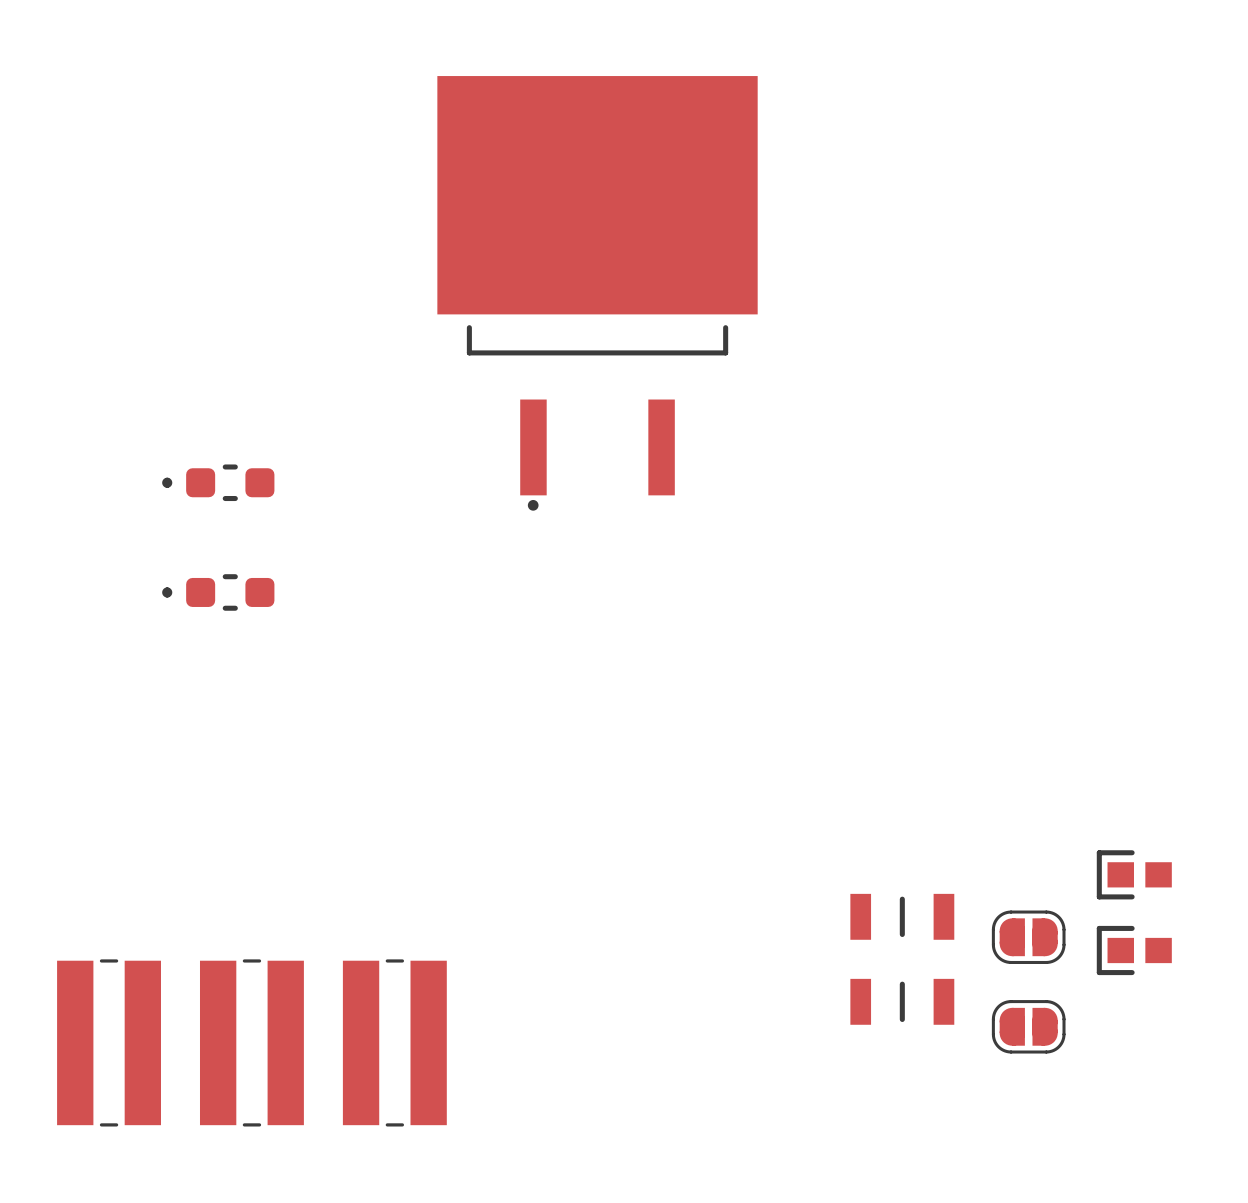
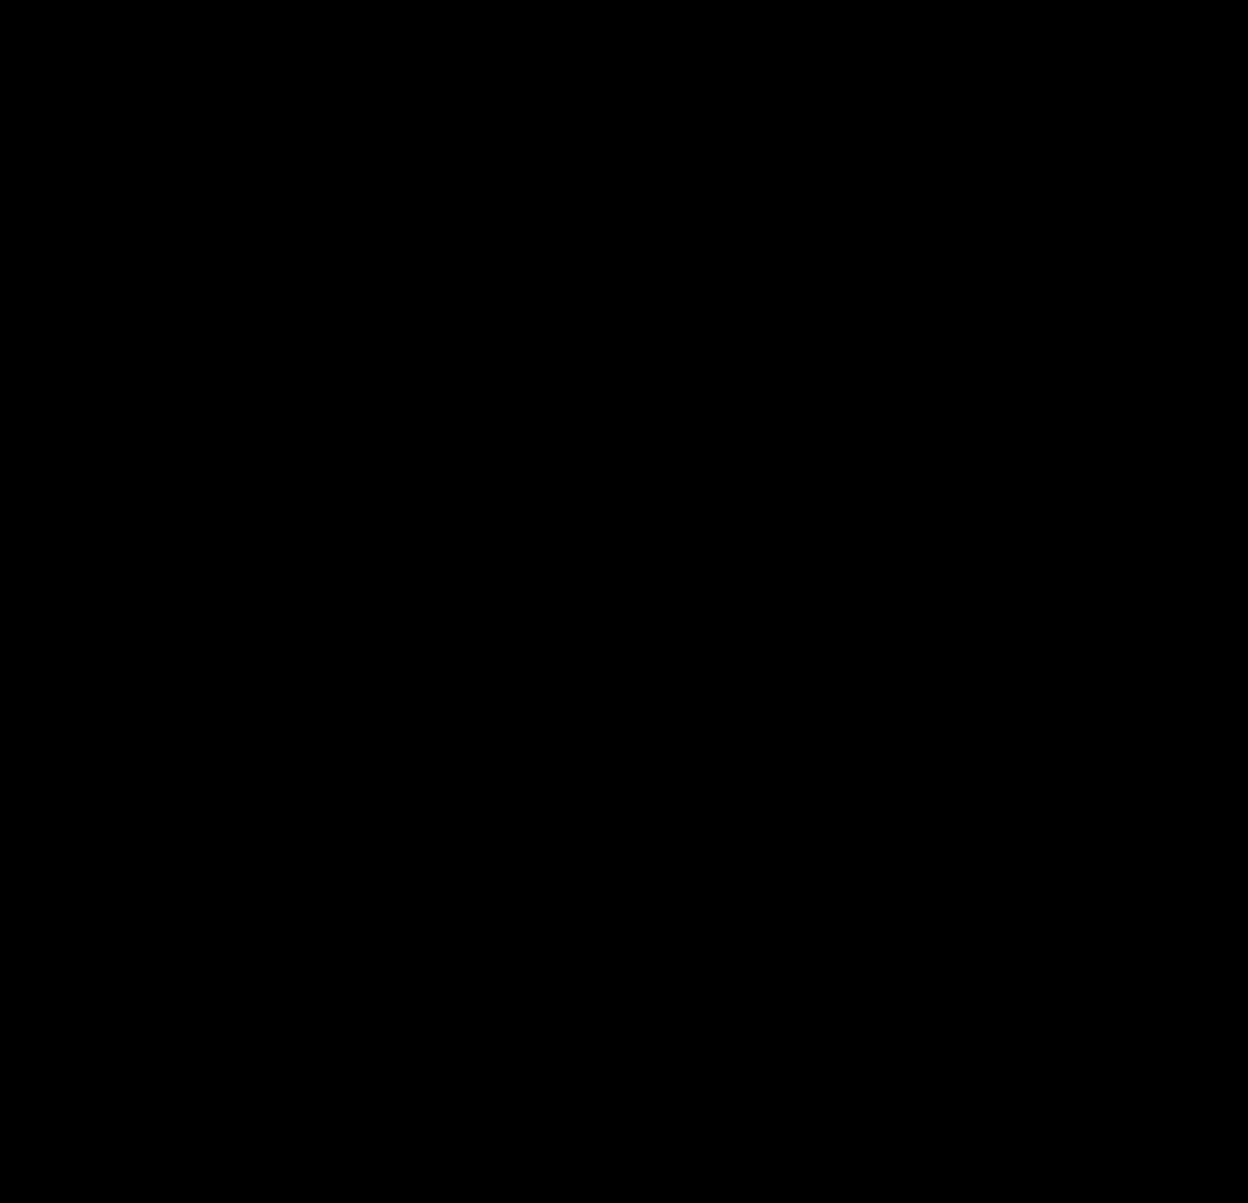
part: (597, 293) -> none
part: (218, 482) -> none
part: (218, 592) -> none
part: (1134, 874) -> none
part: (902, 916) -> none
part: (1028, 937) -> none
part: (1134, 950) -> none
part: (902, 1001) -> none
part: (1028, 1026) -> none
part: (109, 1042) -> none
part: (251, 1042) -> none
part: (394, 1042) -> none

